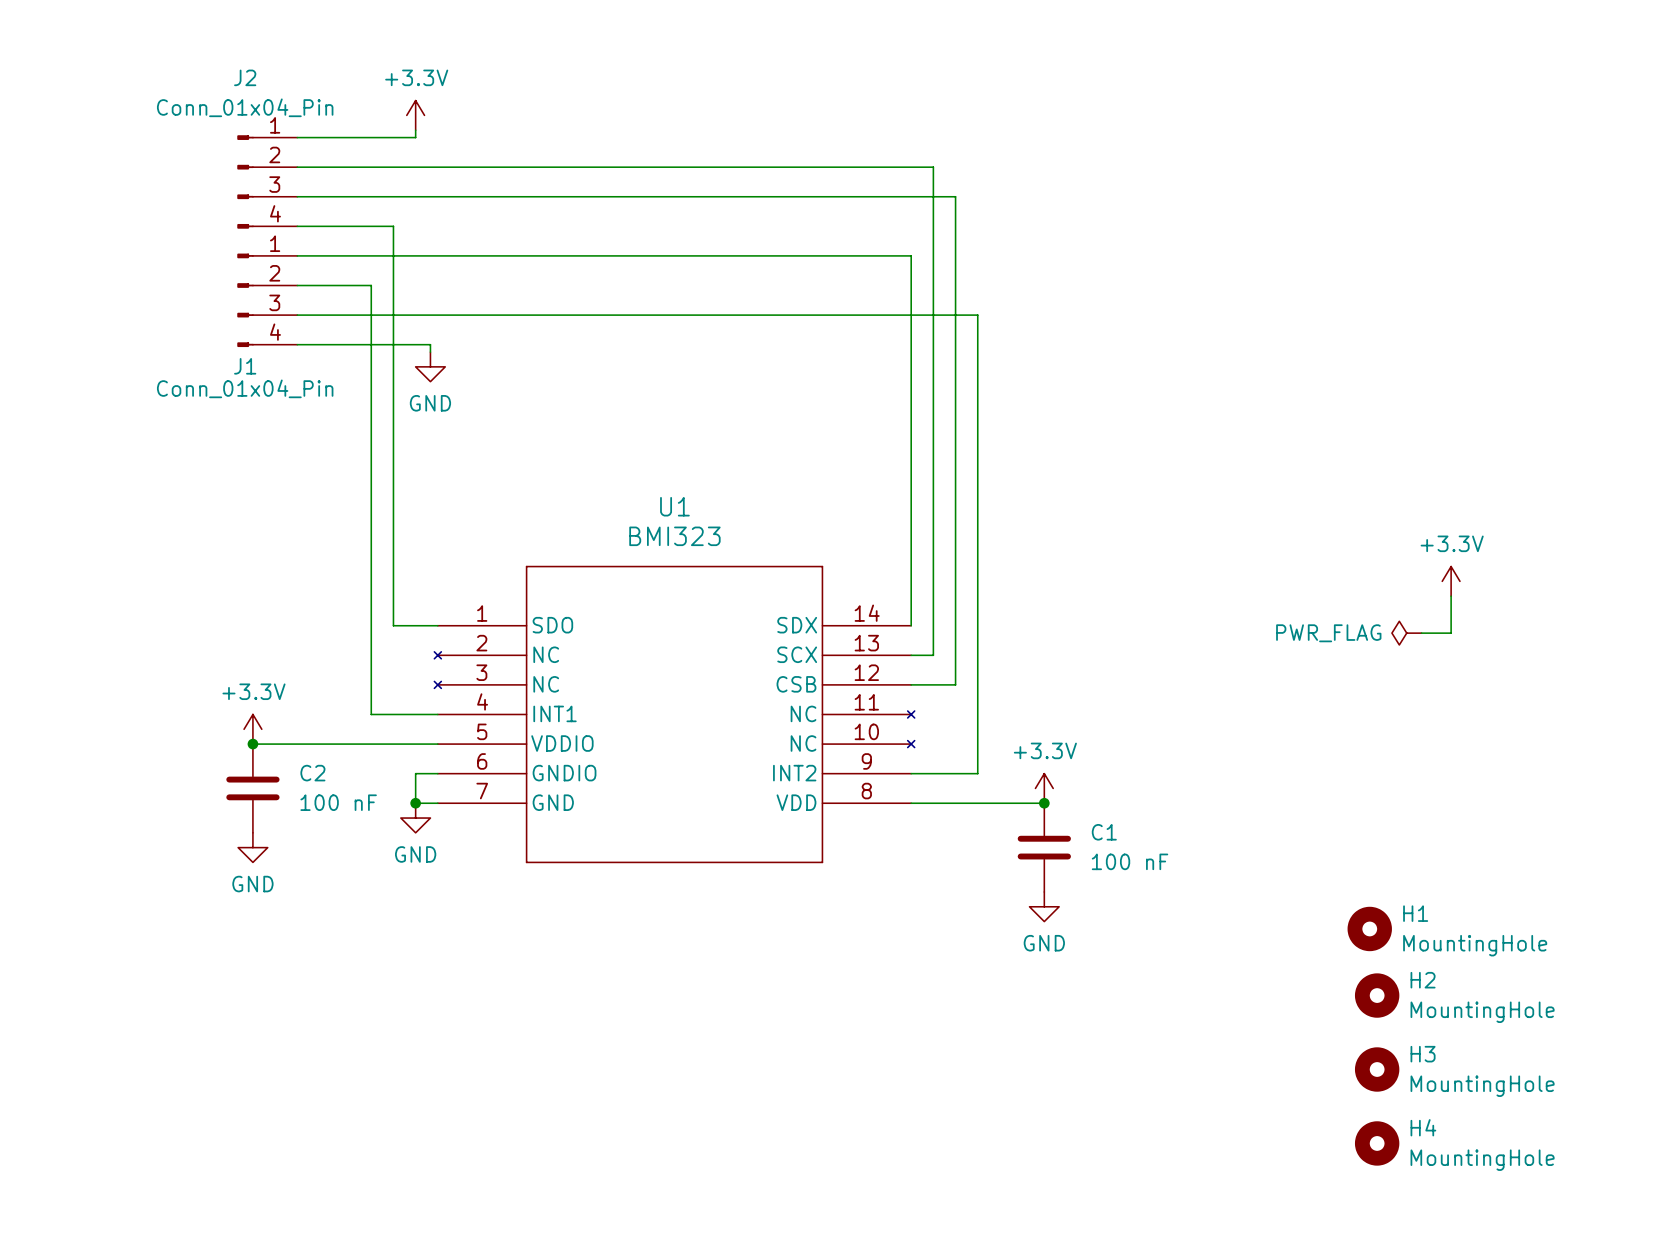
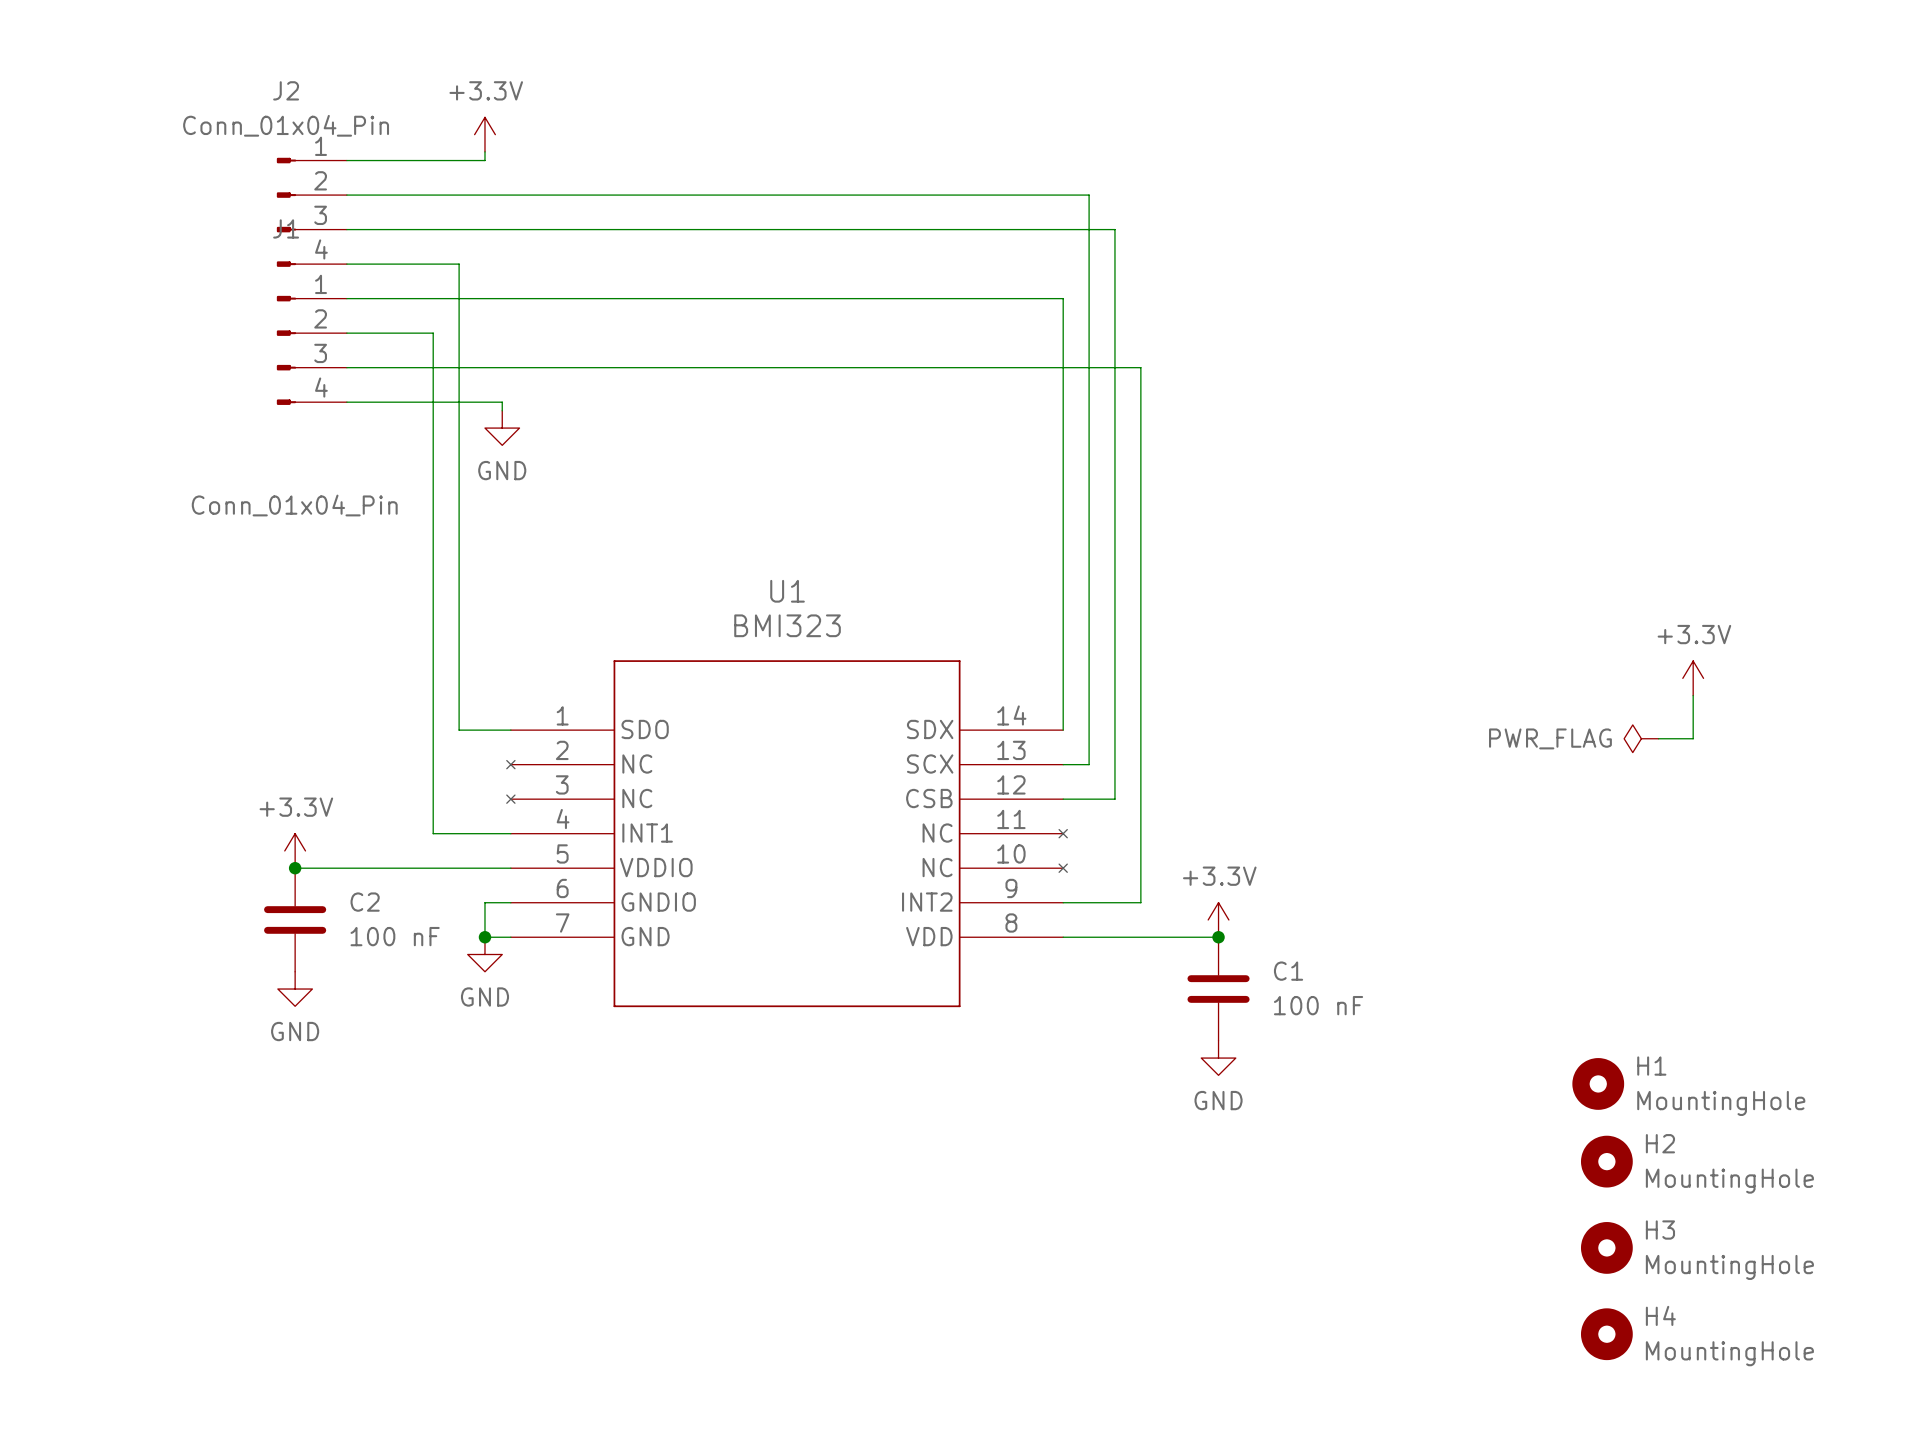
J1 name position: J1 (245, 366) -> J1 (286, 228)
J1 value position: Conn_01x04_Pin (245, 388) -> Conn_01x04_Pin (294, 505)

